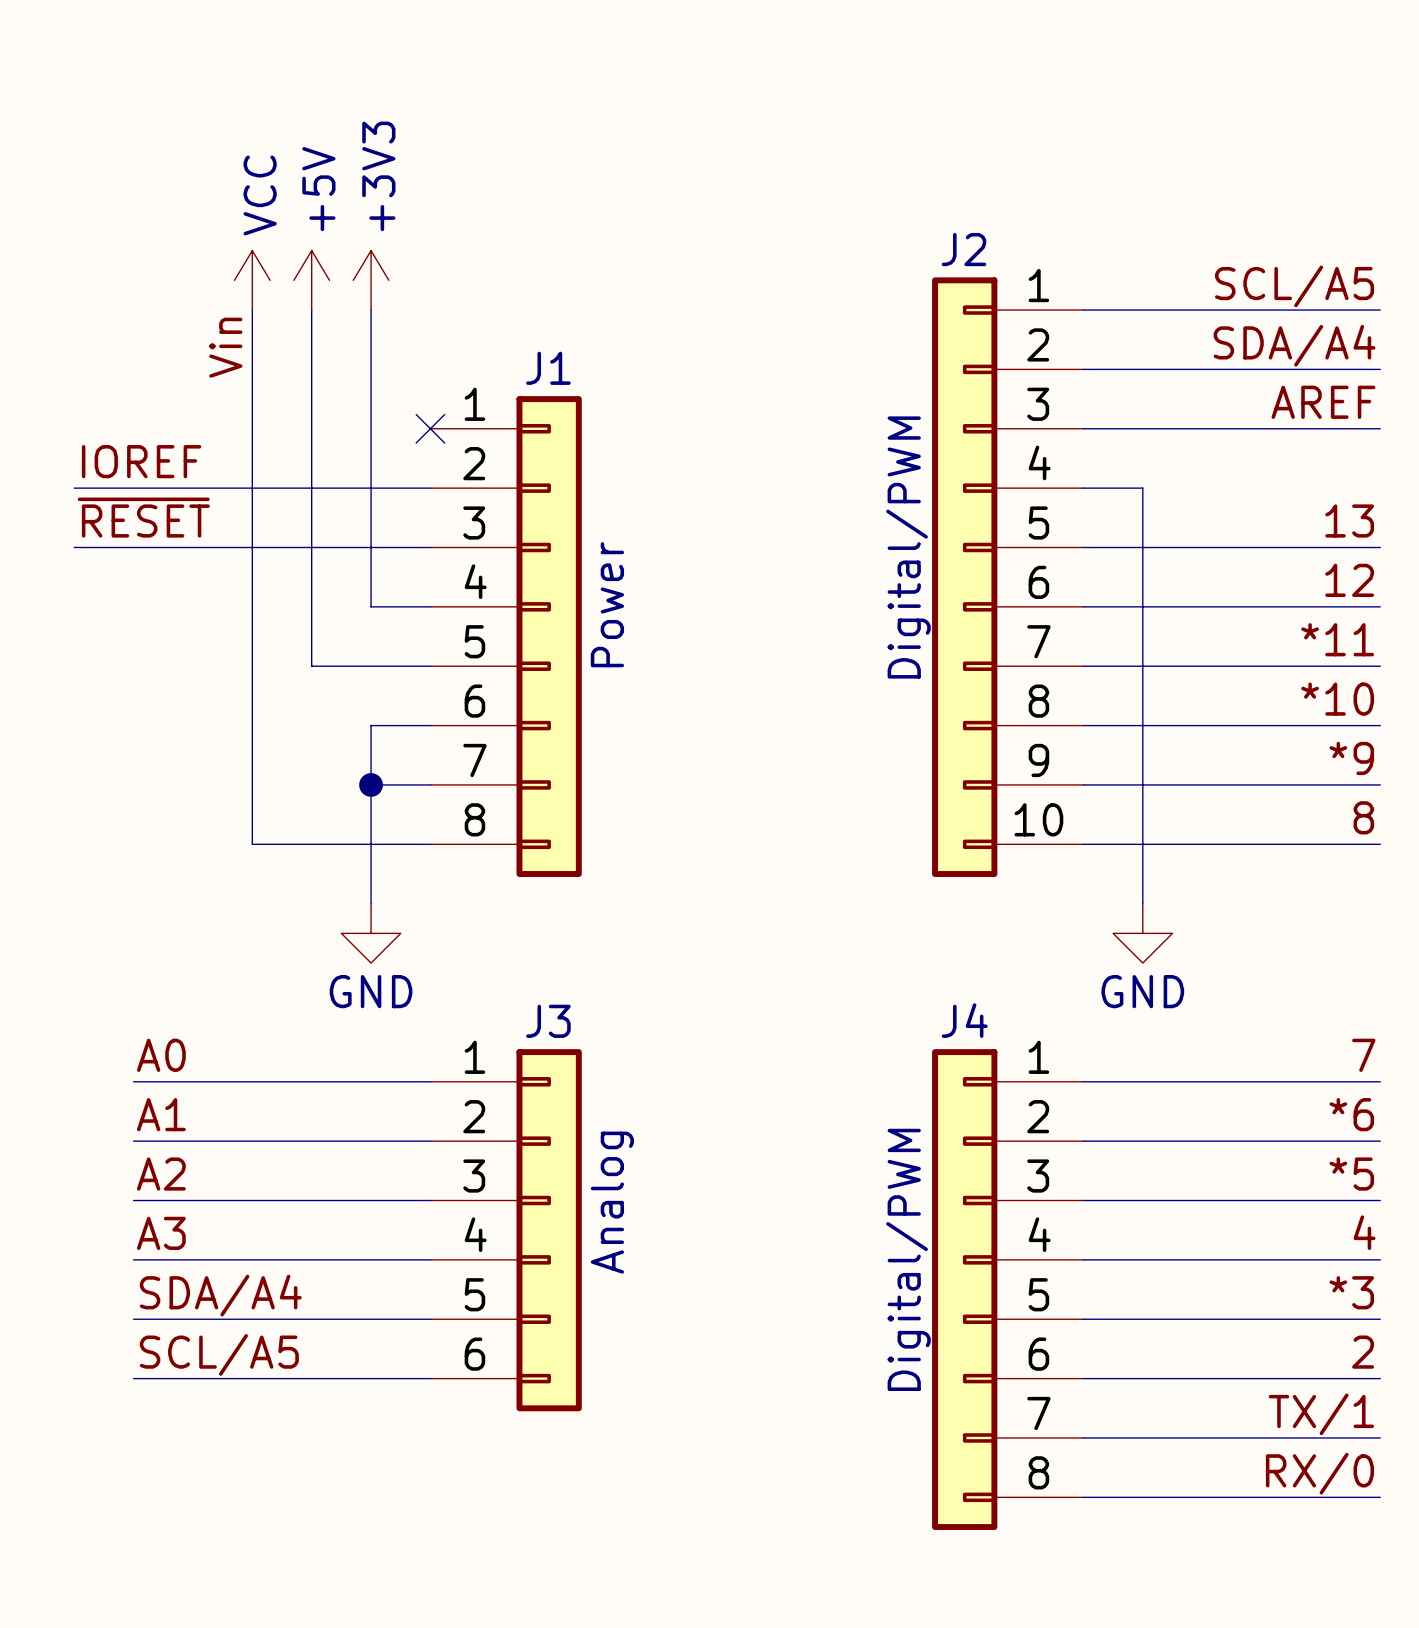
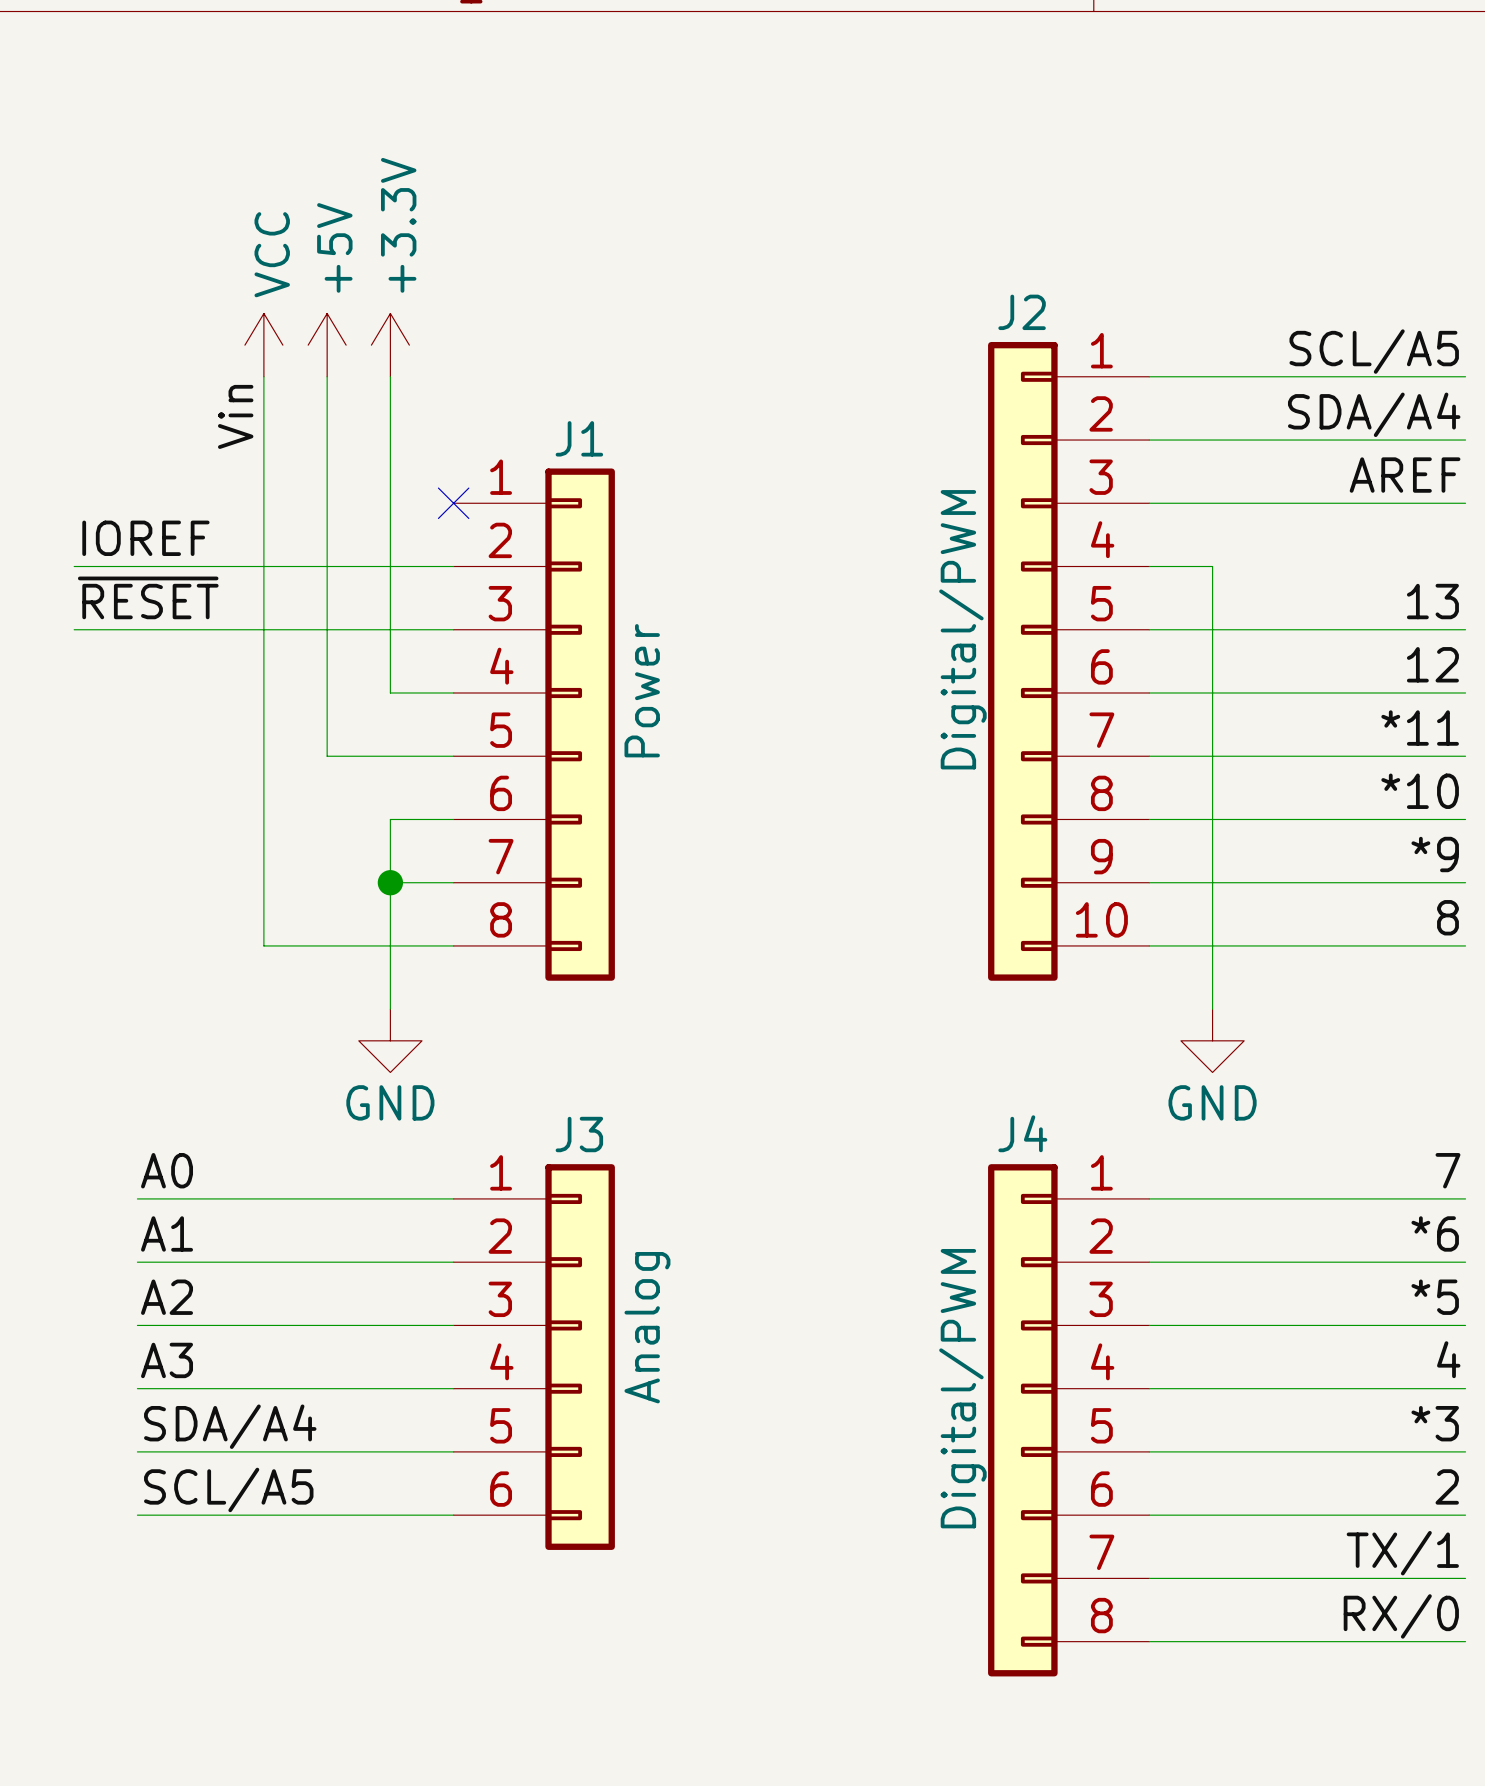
power symbol: +3V3 (371, 280) -> +3.3V (390, 345)

